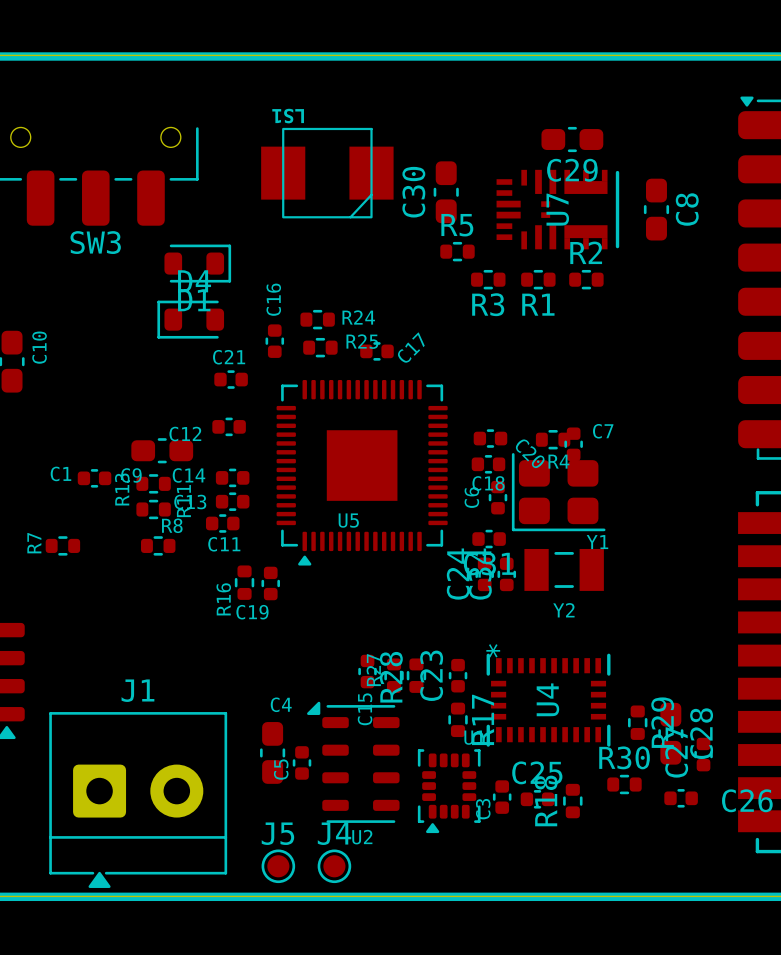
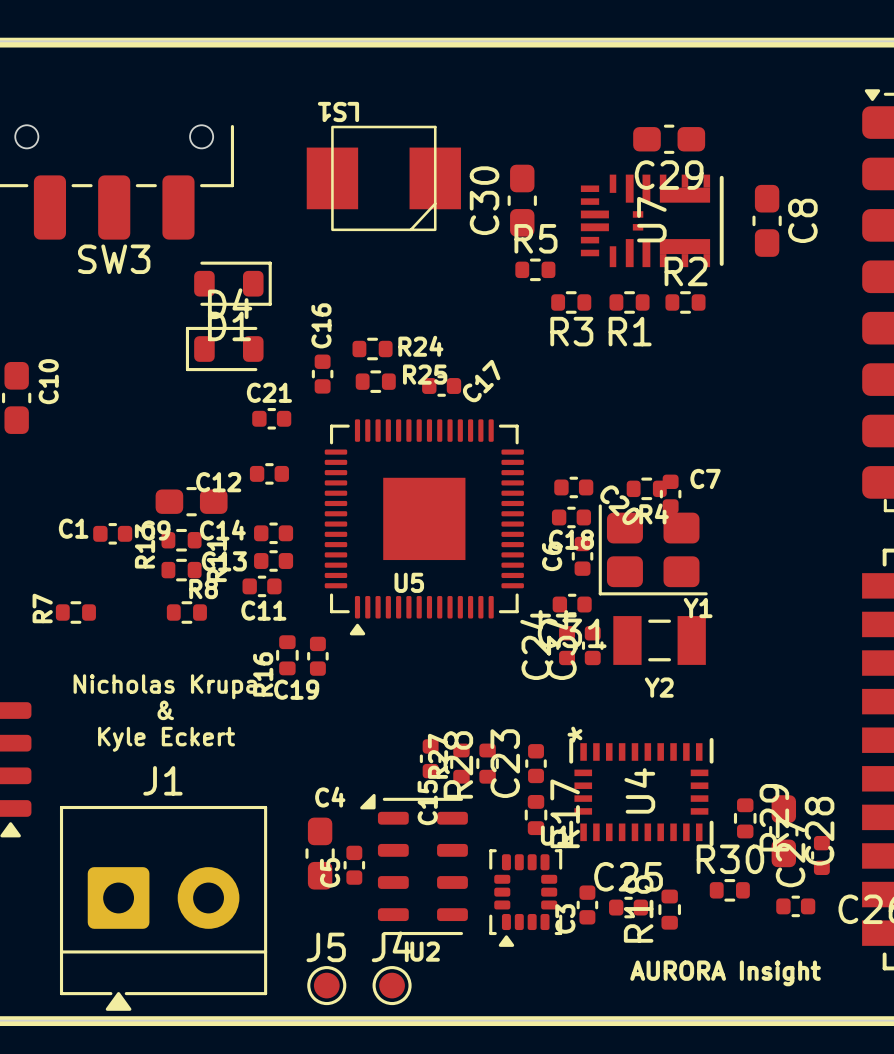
text: none -> Nicholas Krupa (165, 686)
text: none -> & (165, 710)
text: none -> Kyle Eckert (166, 739)
text: none -> AURORA Insight (725, 973)

